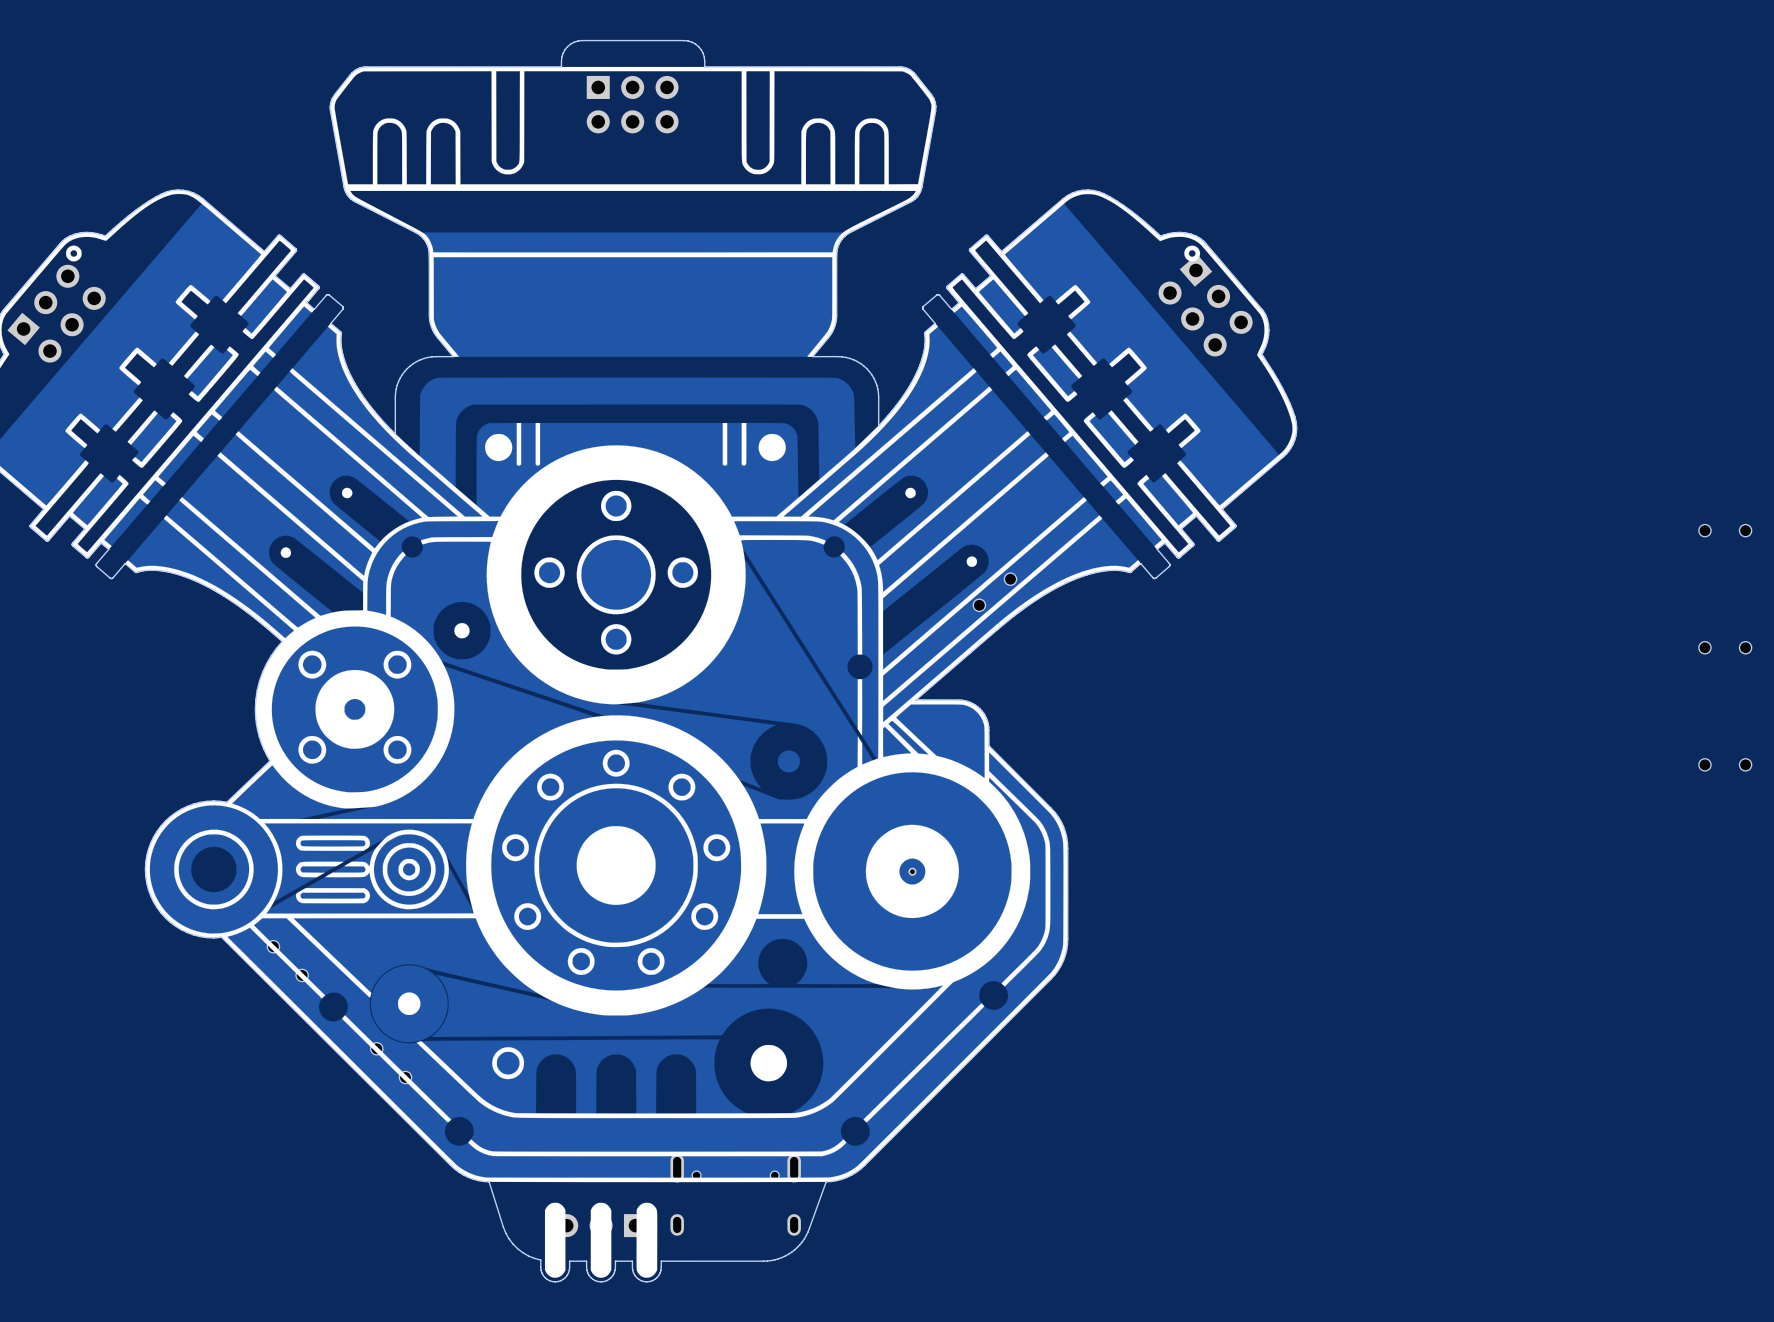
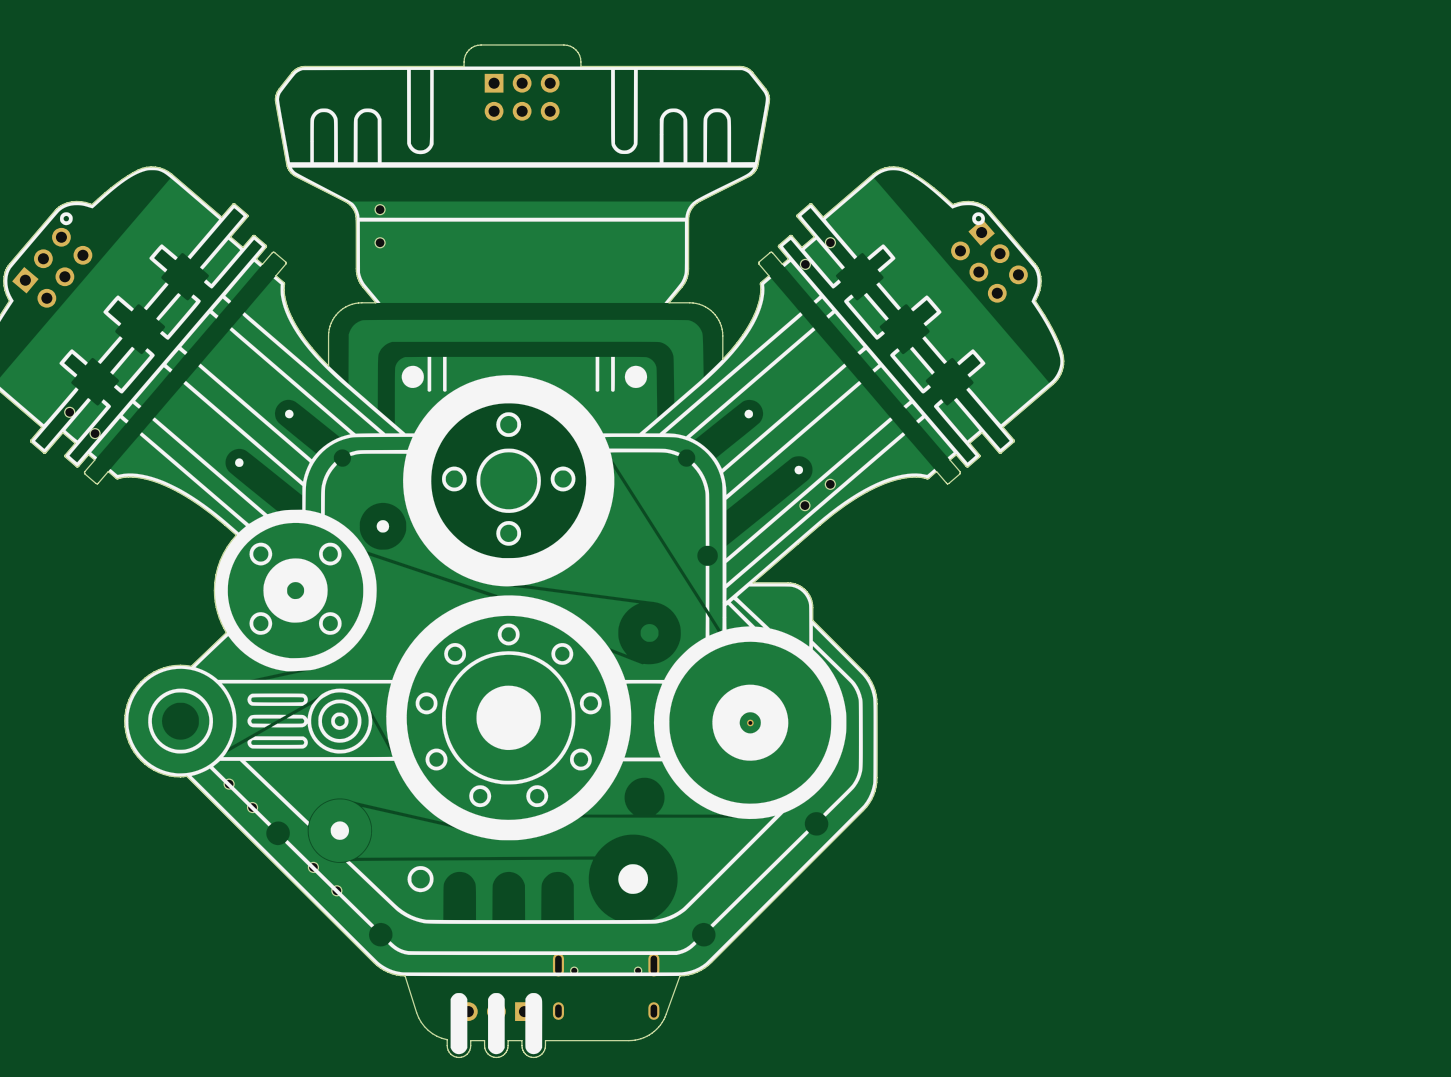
part: none -> (380, 226)
part: none -> (817, 253)
part: none -> (82, 422)
part: (1725, 530) -> none
part: (1725, 647) -> none
part: (1725, 764) -> none

